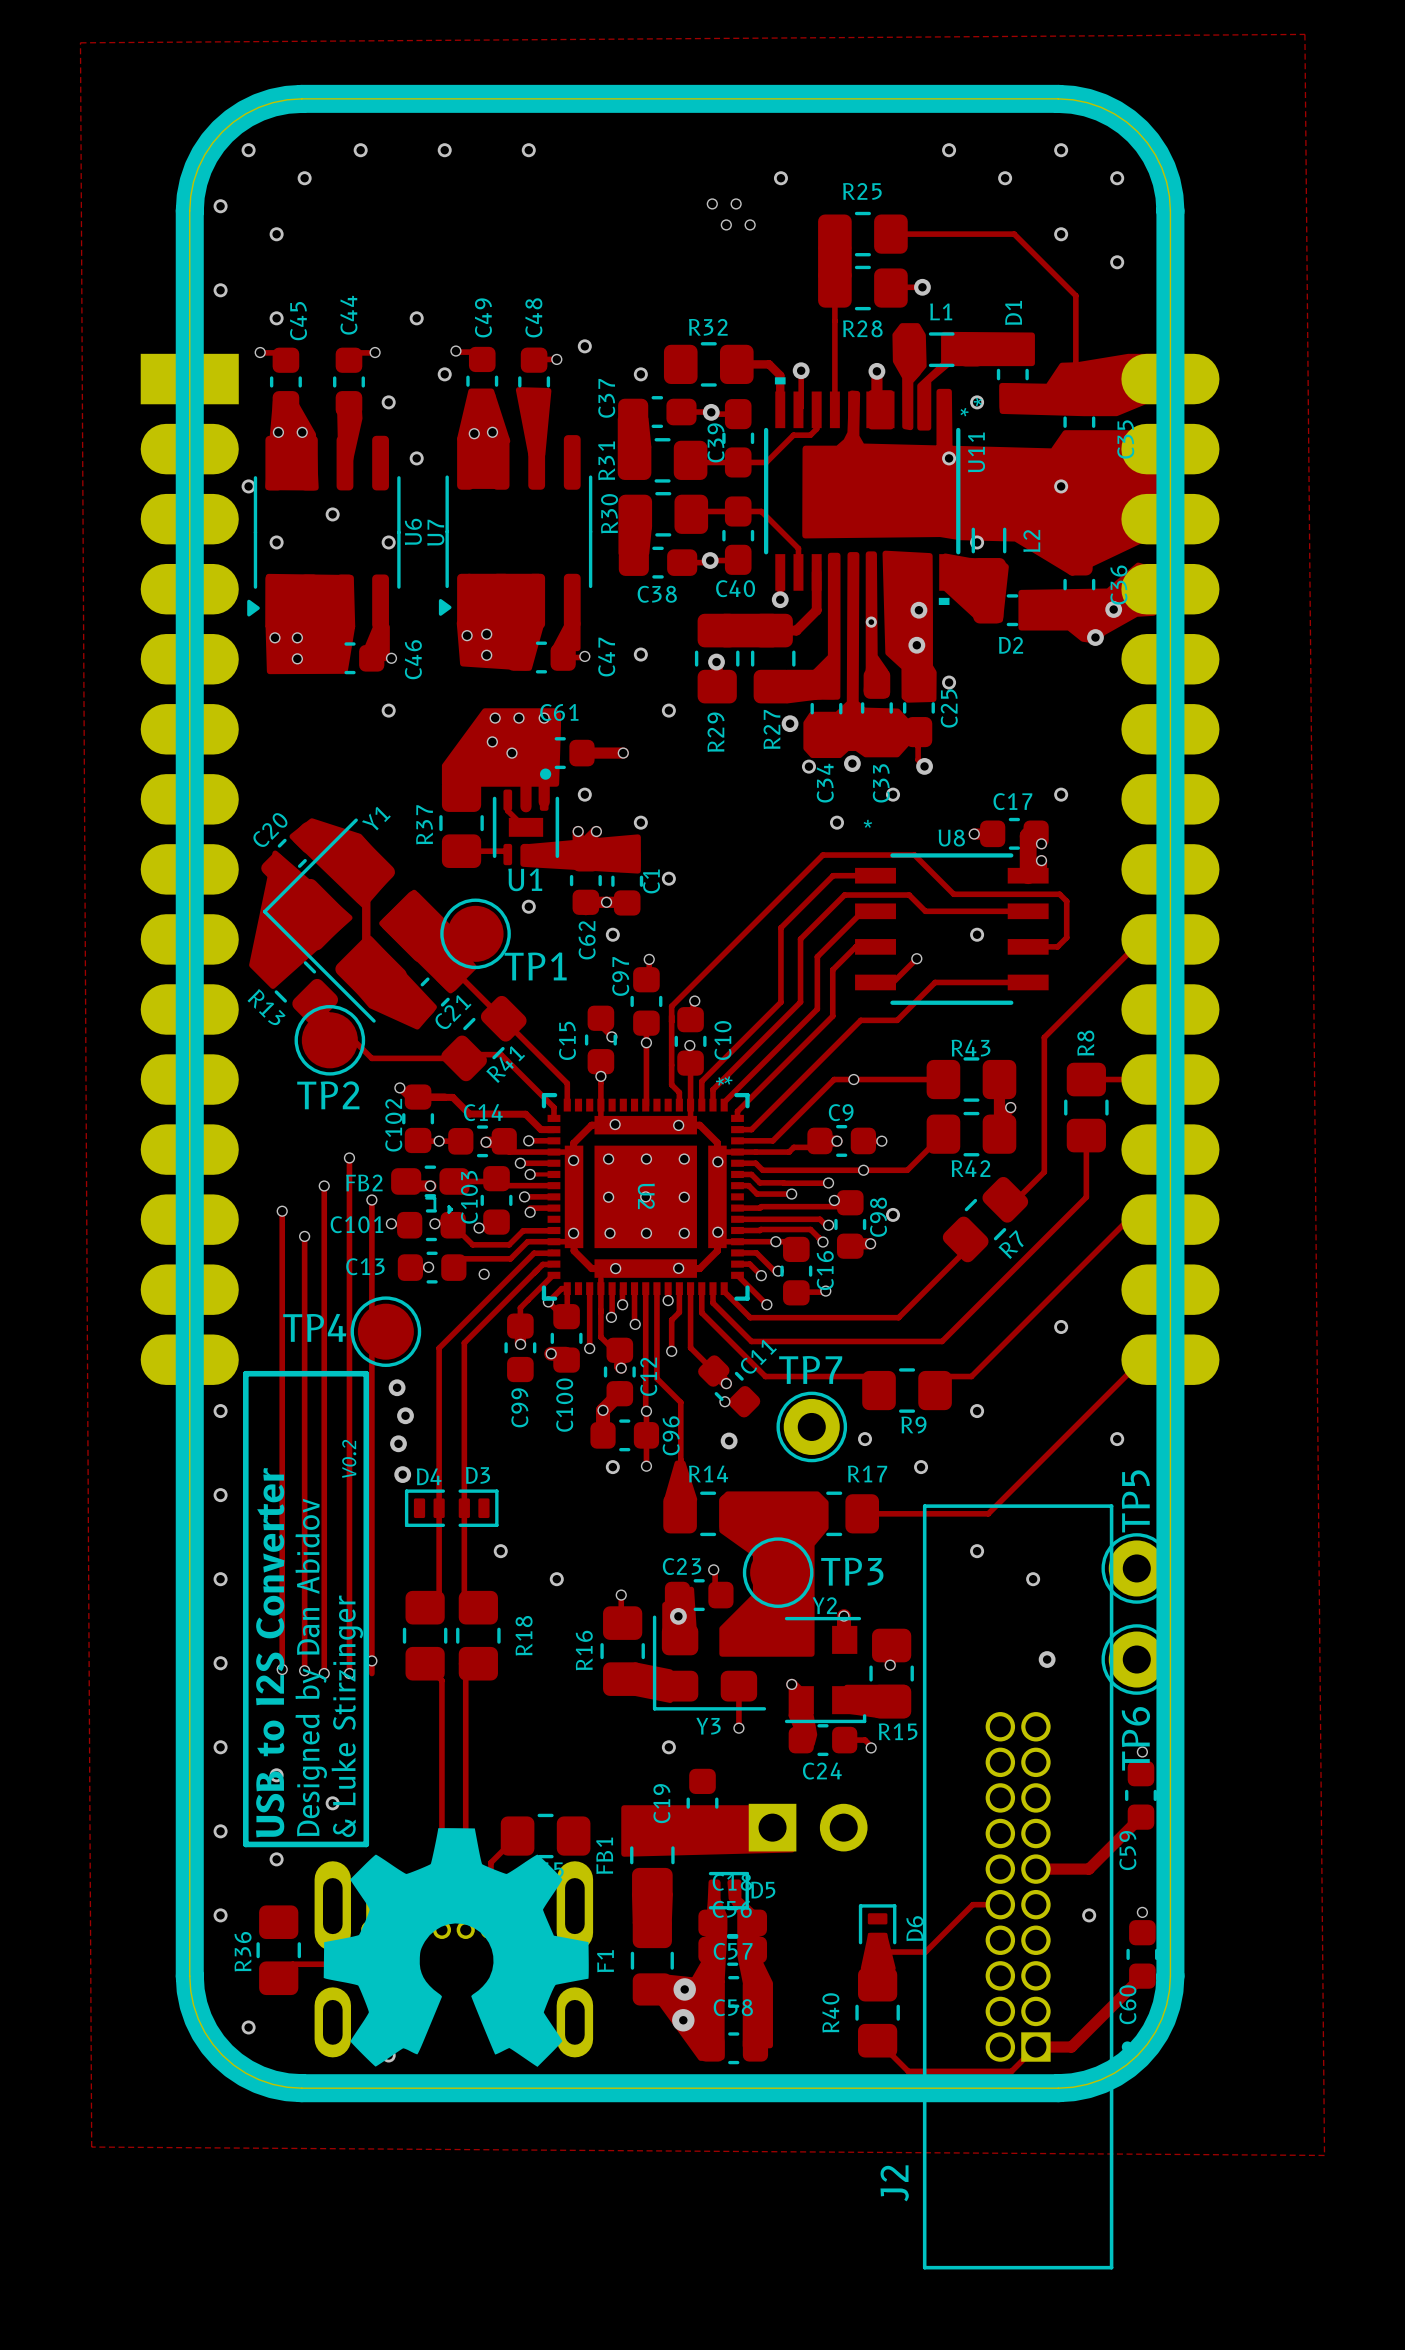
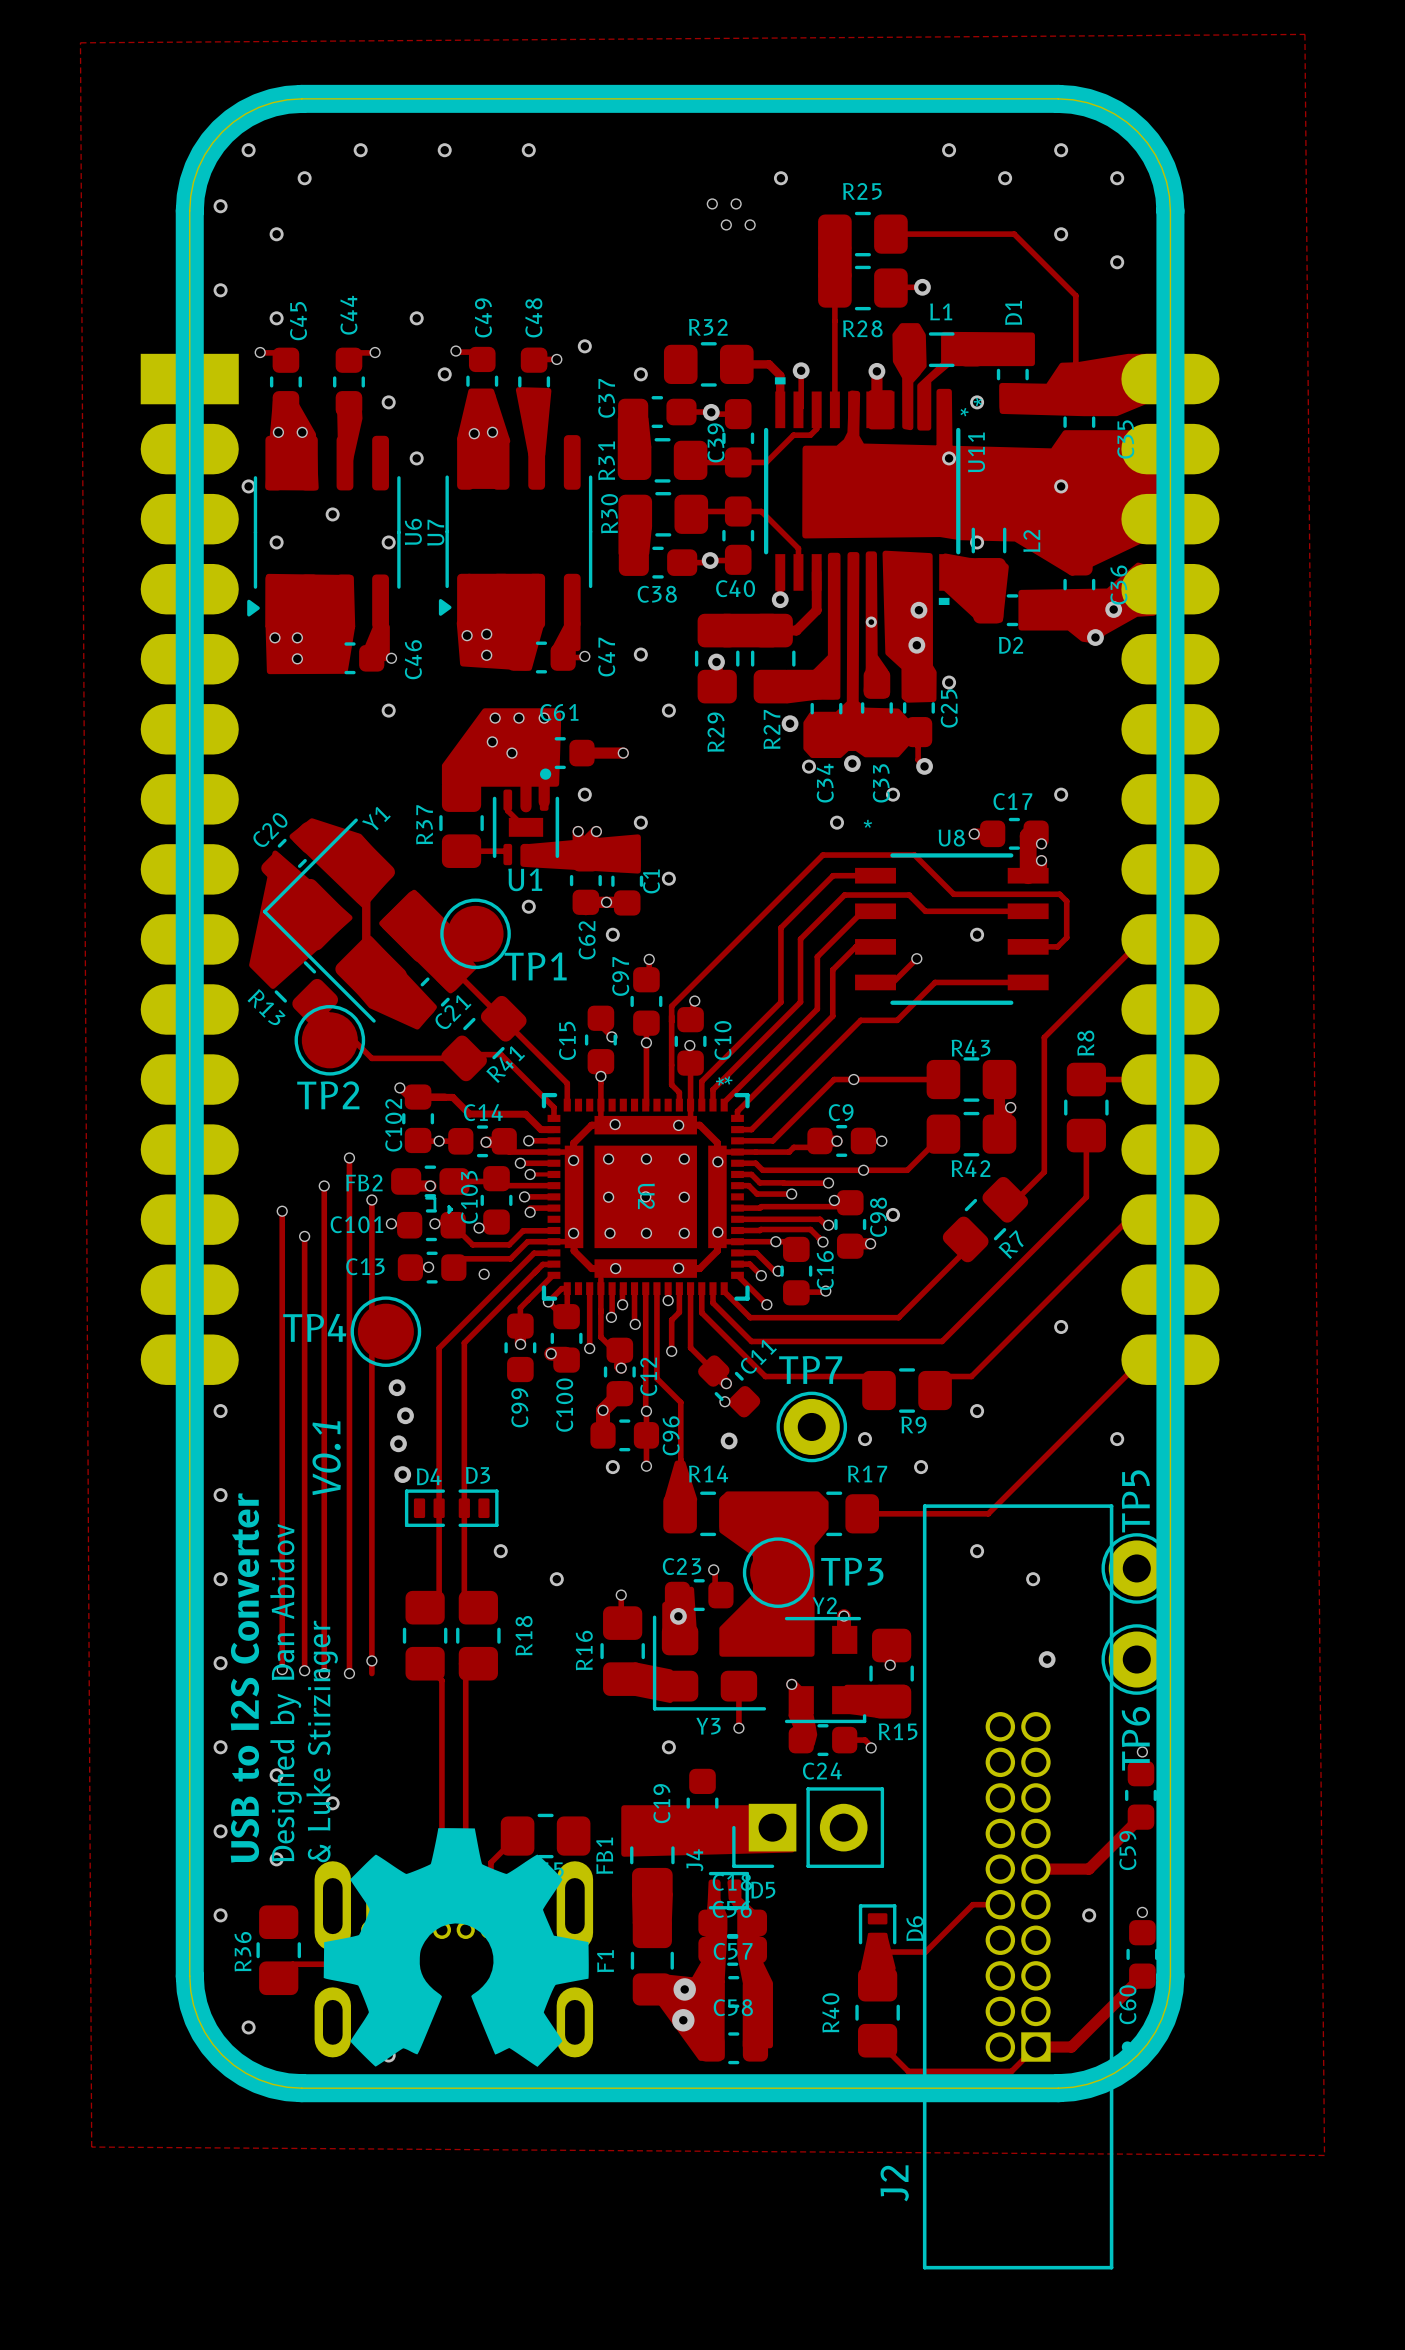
line: (245, 1373) (245, 1844) (366, 1844) (366, 1373) (245, 1373) -> none
text: V0.2 (349, 1458) -> V0.1 (326, 1458)
text position: USB to I2S Converter (270, 1652) -> USB to I2S Converter (244, 1677)
text position: Designed by Dan Abidov (311, 1667) -> Designed by Dan Abidov (286, 1692)
text position: & Luke Stirzinger (347, 1716) -> & Luke Stirzinger (322, 1741)
J4 side: bottom (808, 1827) -> top (808, 1827)

